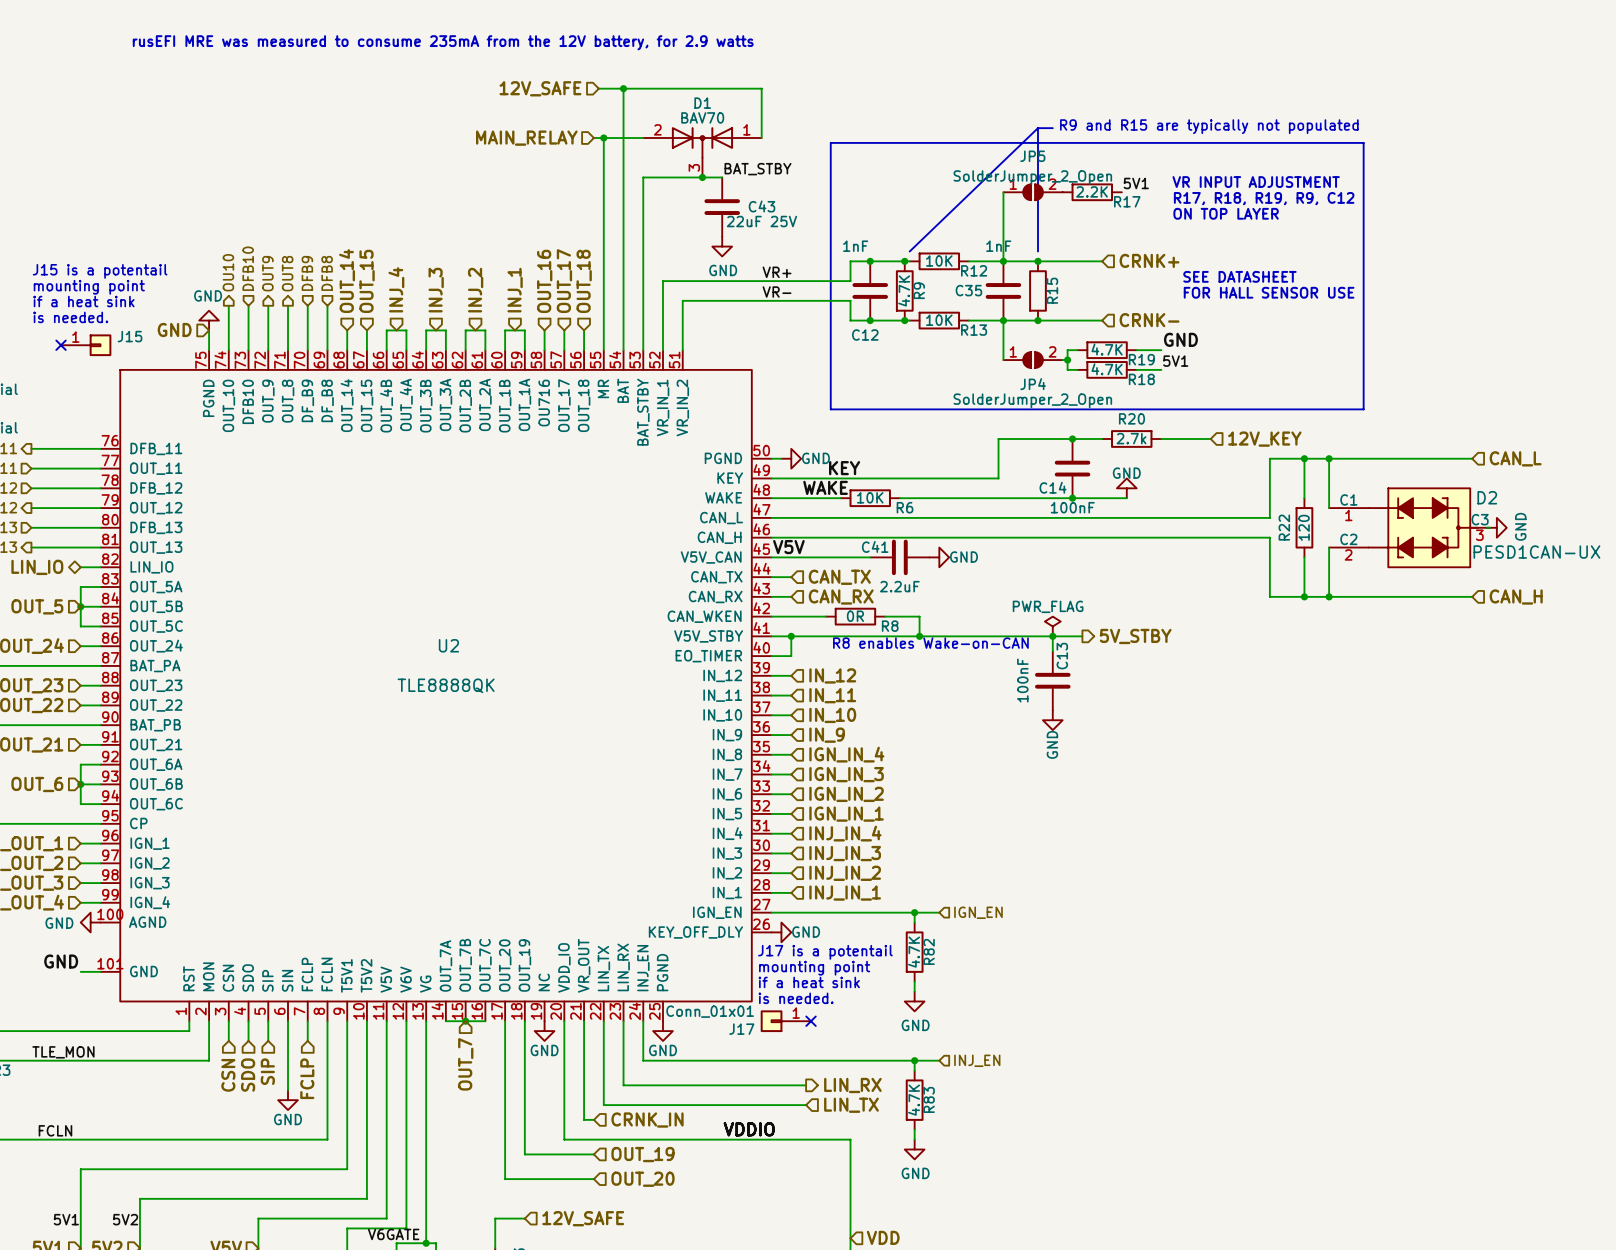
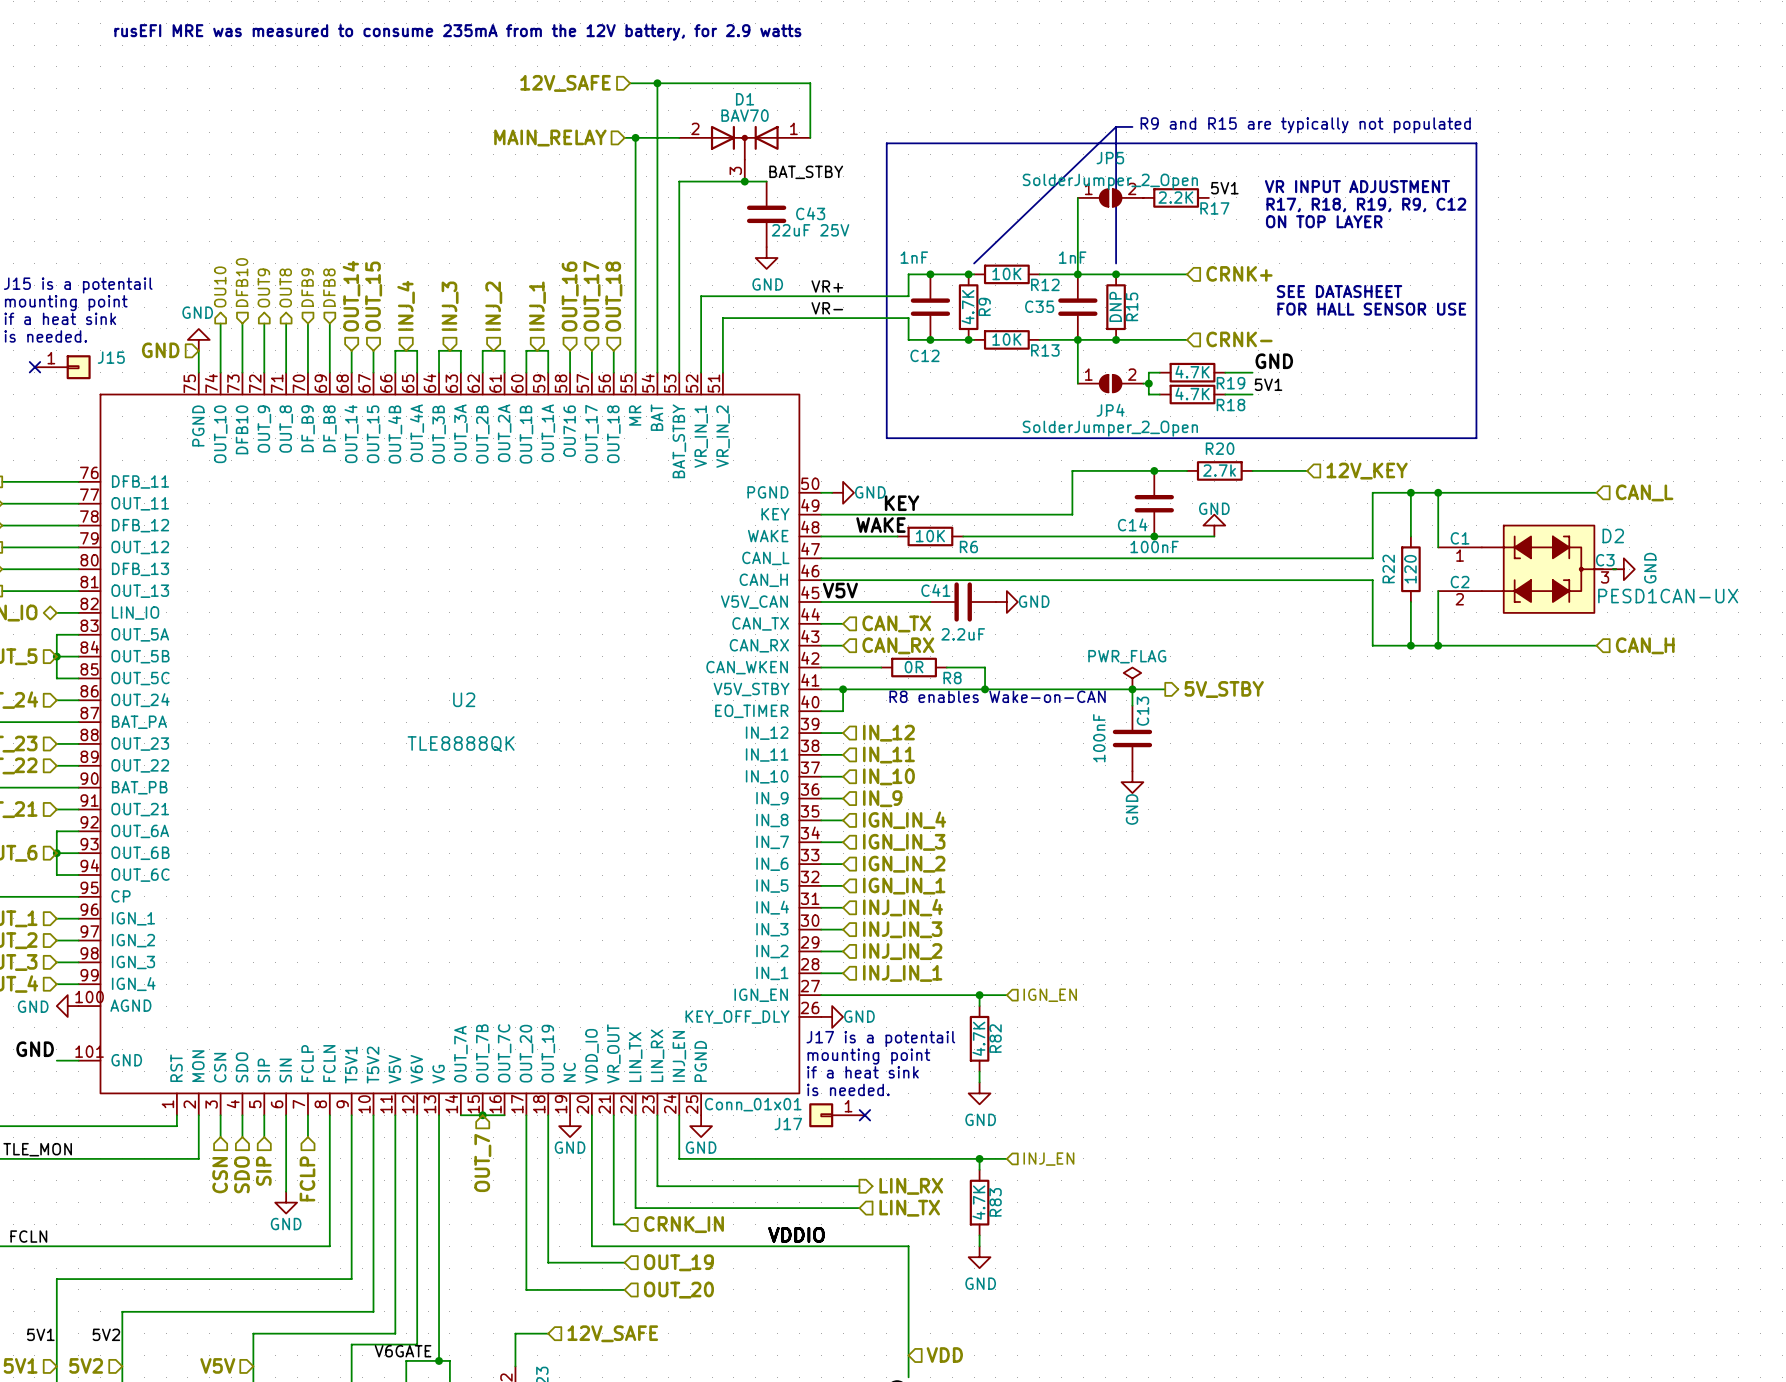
R15 value: none -> DNP (1115, 306)

